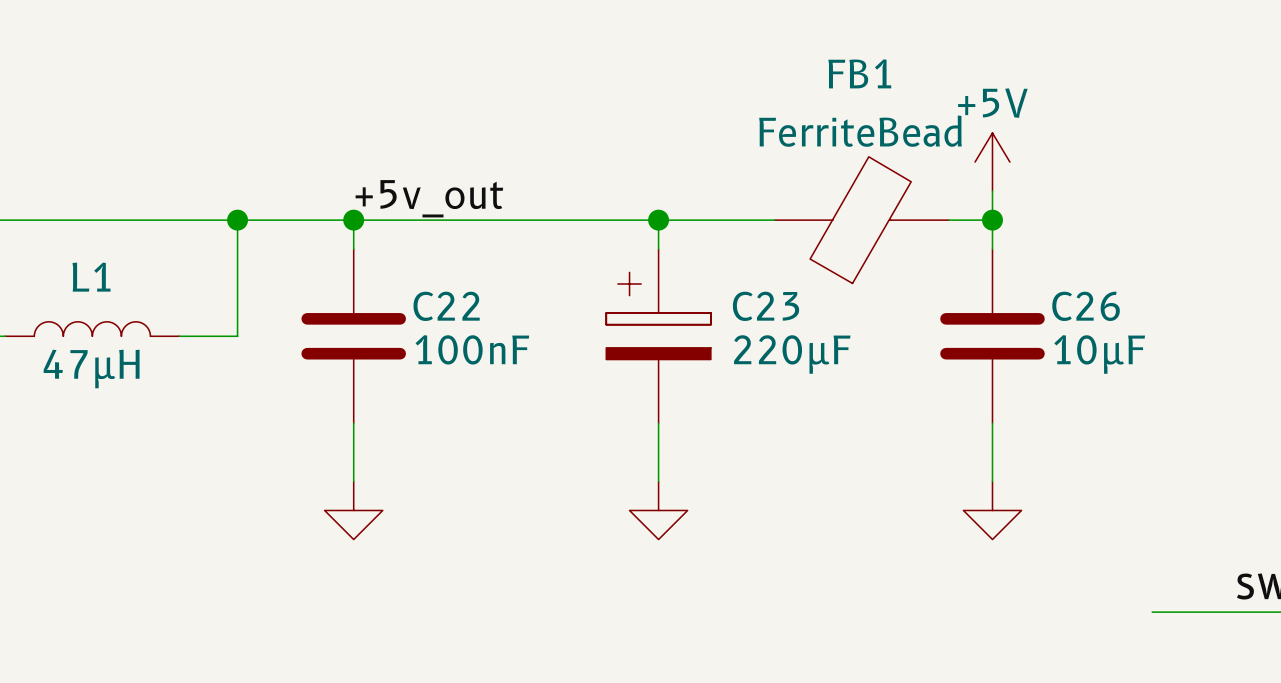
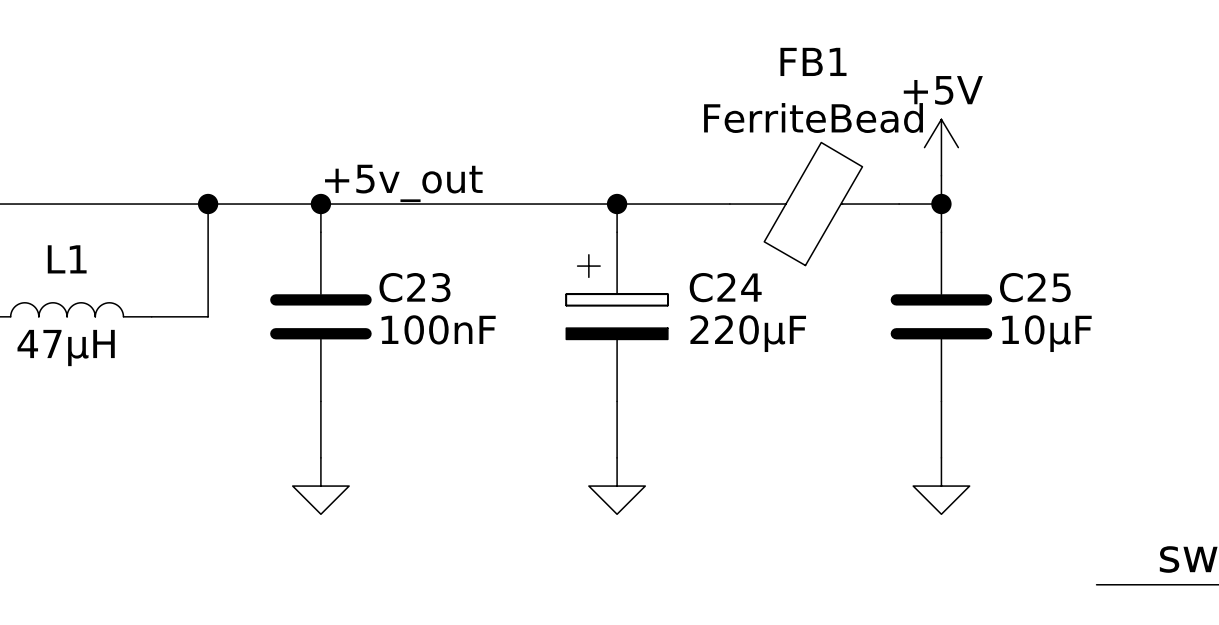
C22 name: C22 (446, 306) -> C23 (414, 287)
C23 name: C23 (766, 306) -> C24 (725, 287)
C26 name: C26 (1086, 306) -> C25 (1035, 287)

